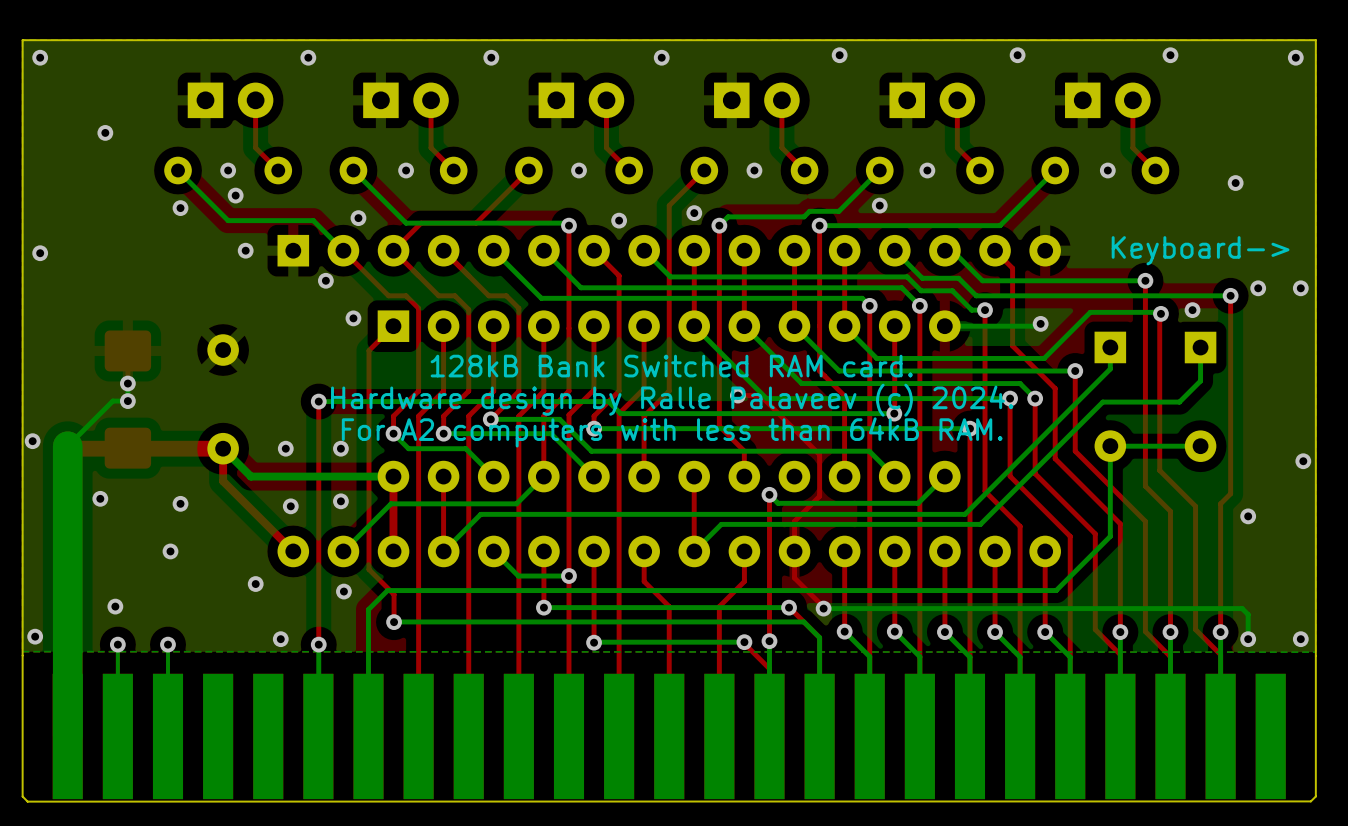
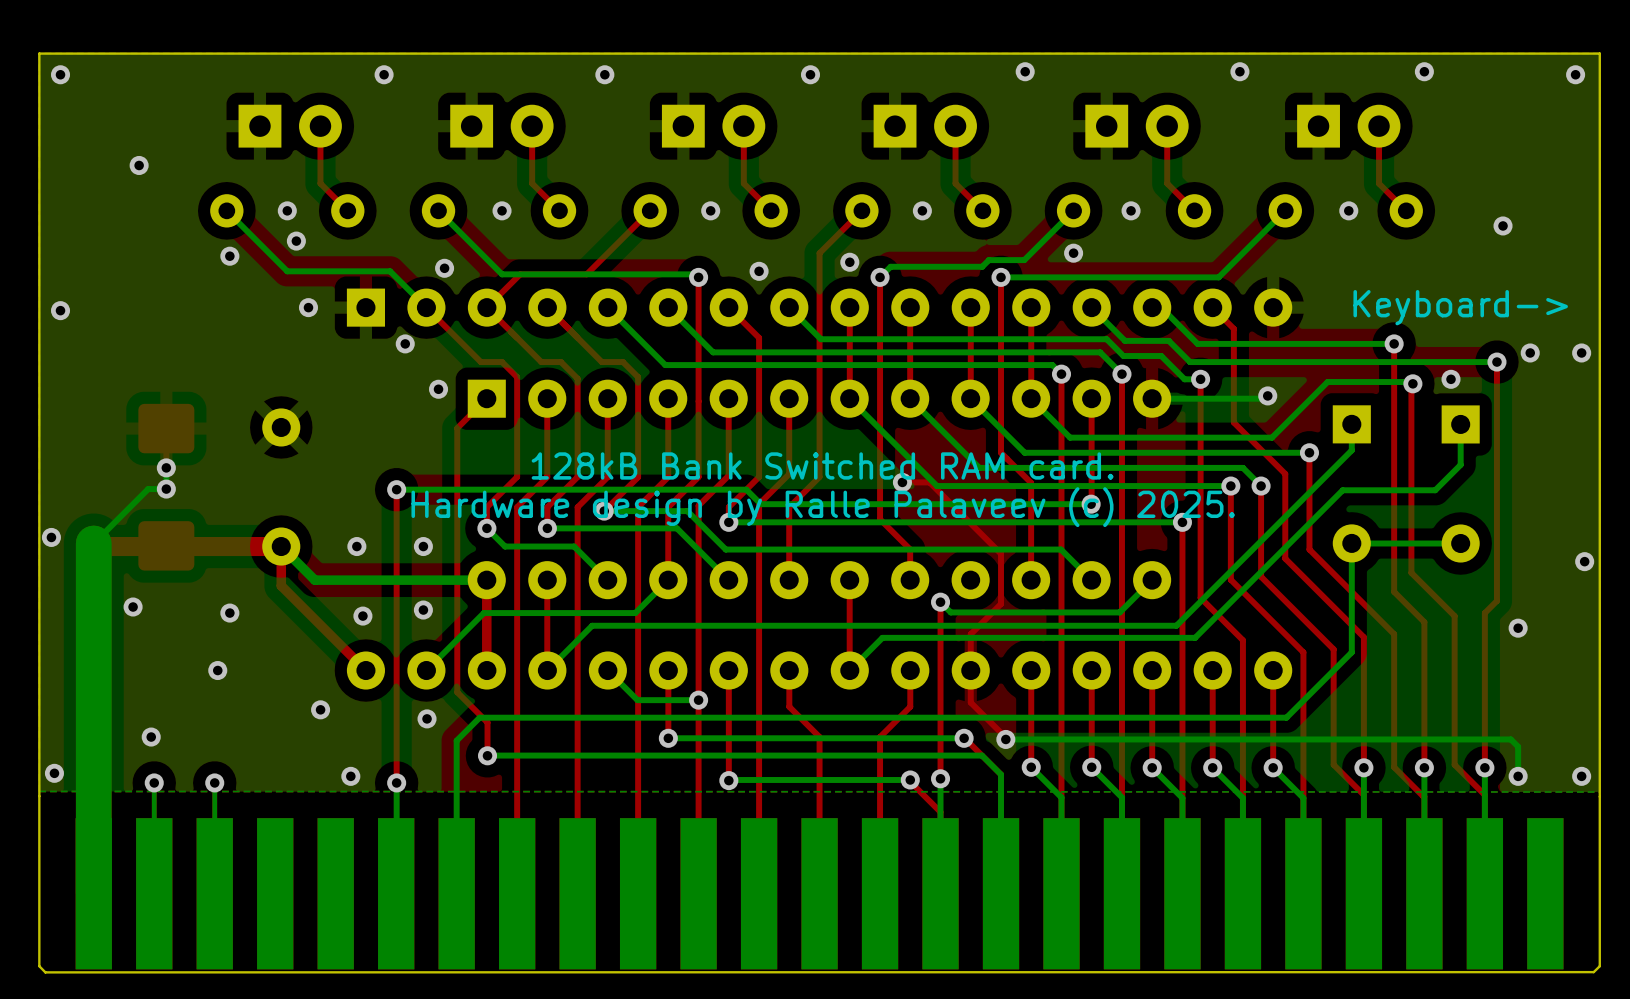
text position: 128kB Bank Switched RAM card. (671, 366) -> 128kB Bank Switched RAM card. (822, 465)
text: Hardware design by Ralle Palaveev (c) 2024. (672, 400) -> Hardware design by Ralle Palaveev (c) 2025. (823, 507)
text: For A2 computers with less than 64kB RAM. (672, 432) -> none

